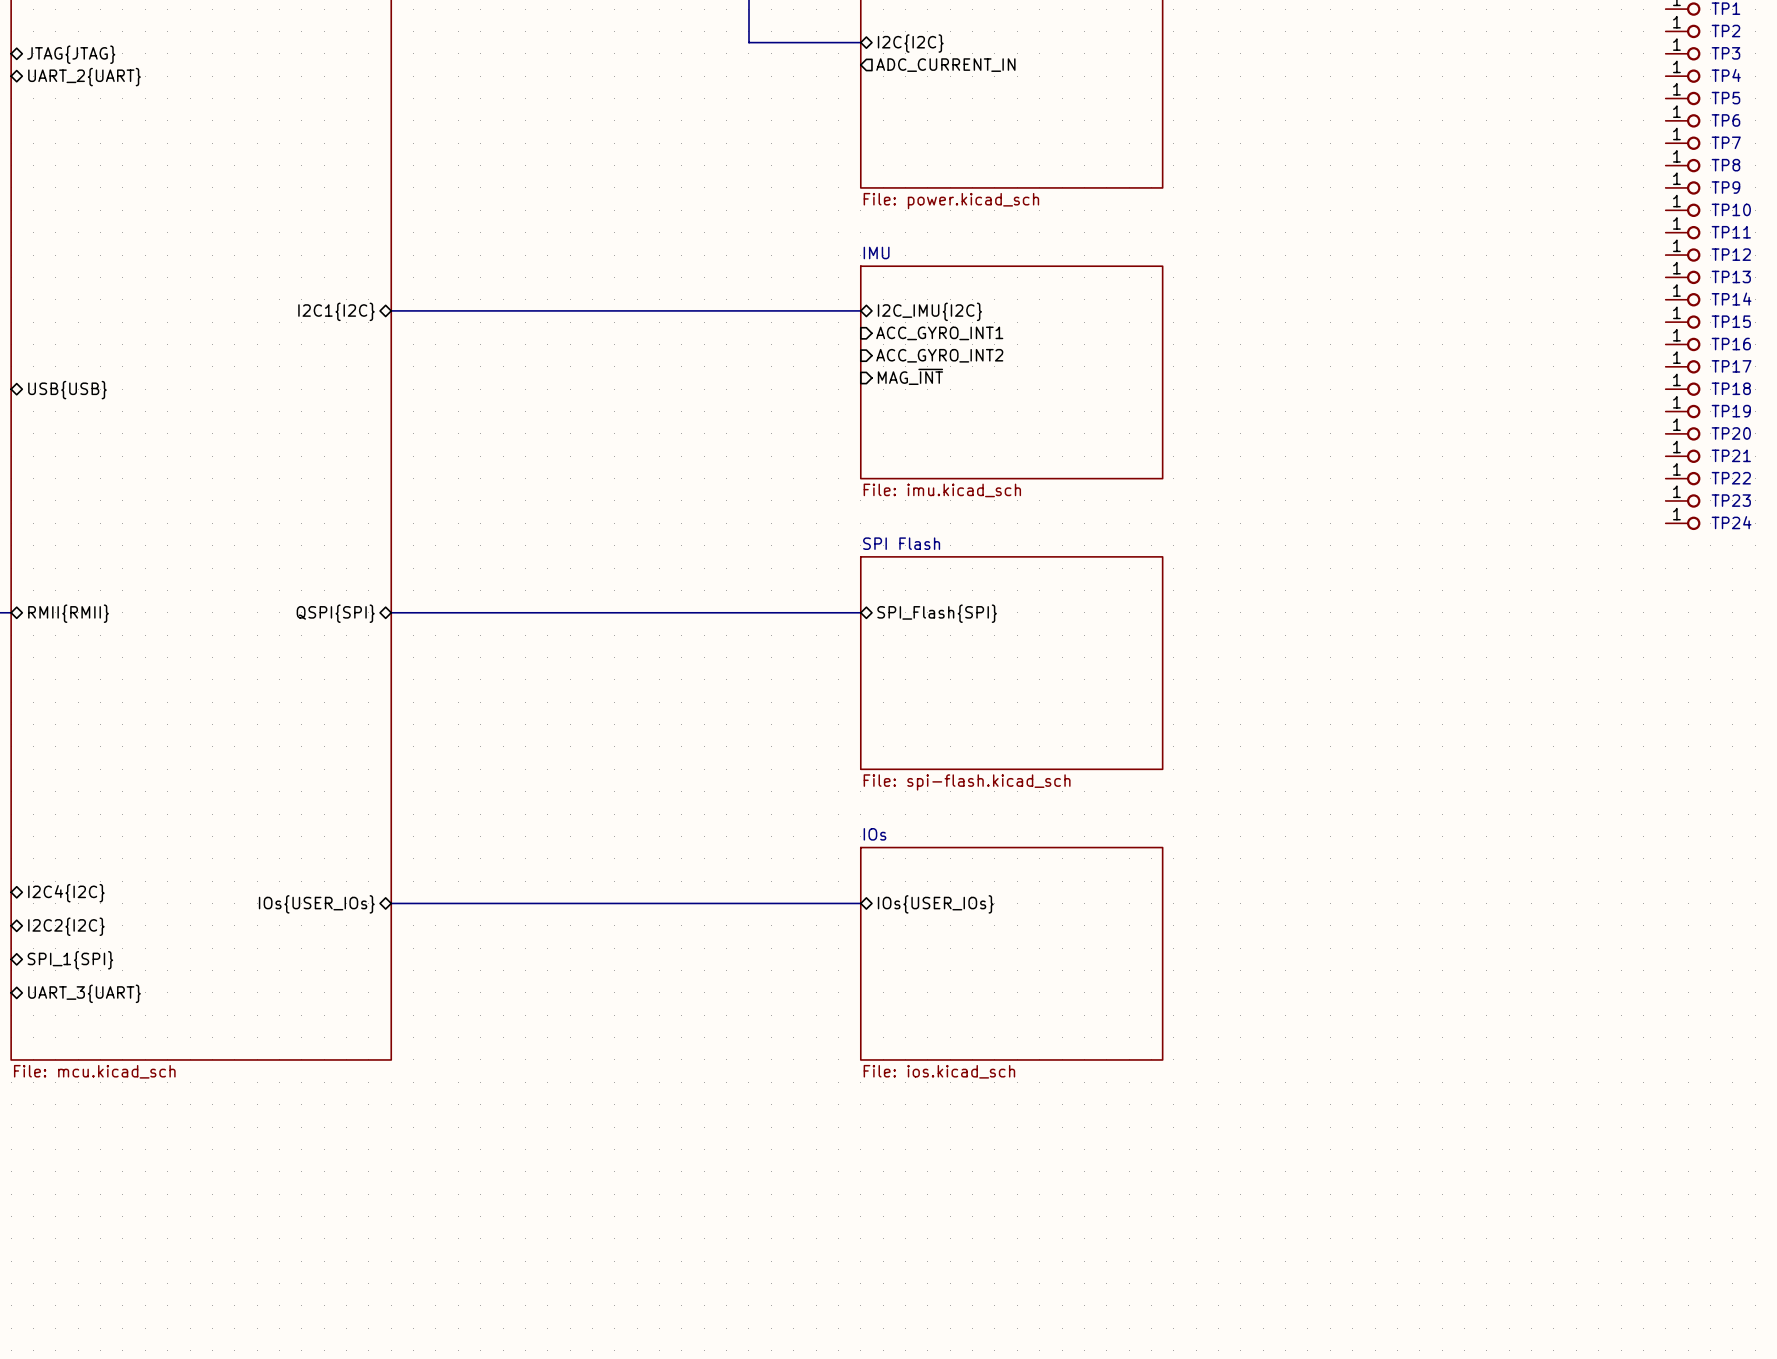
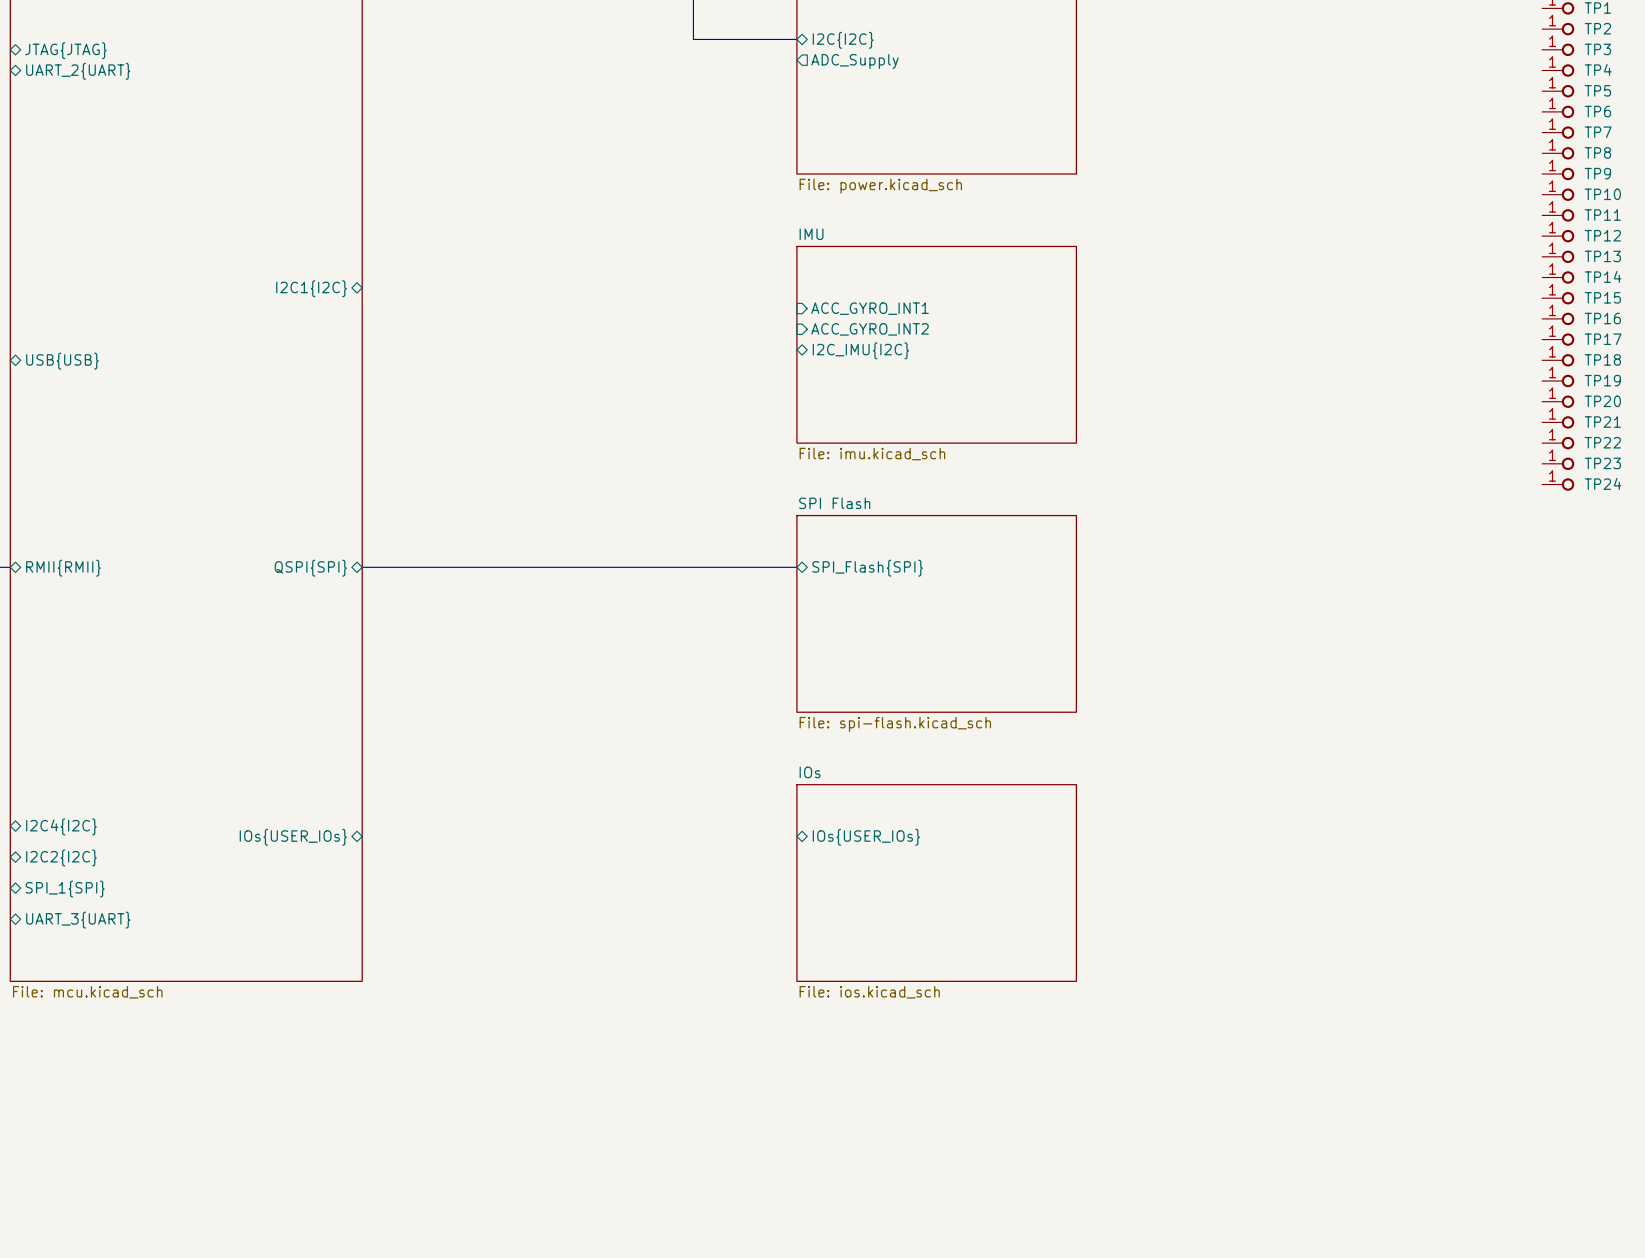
sheet pin: ADC_CURRENT_IN (945, 65) -> ADC_Supply (855, 61)
bus: (391, 310) (860, 310) -> none
sheet pin: I2C_IMU{I2C} (929, 311) -> none
sheet pin shape: input (910, 376) -> bidirectional (860, 350)
sheet pin: MAG_~{INT} (910, 376) -> I2C_IMU{I2C} (860, 350)
bus: (391, 903) (860, 903) -> none

